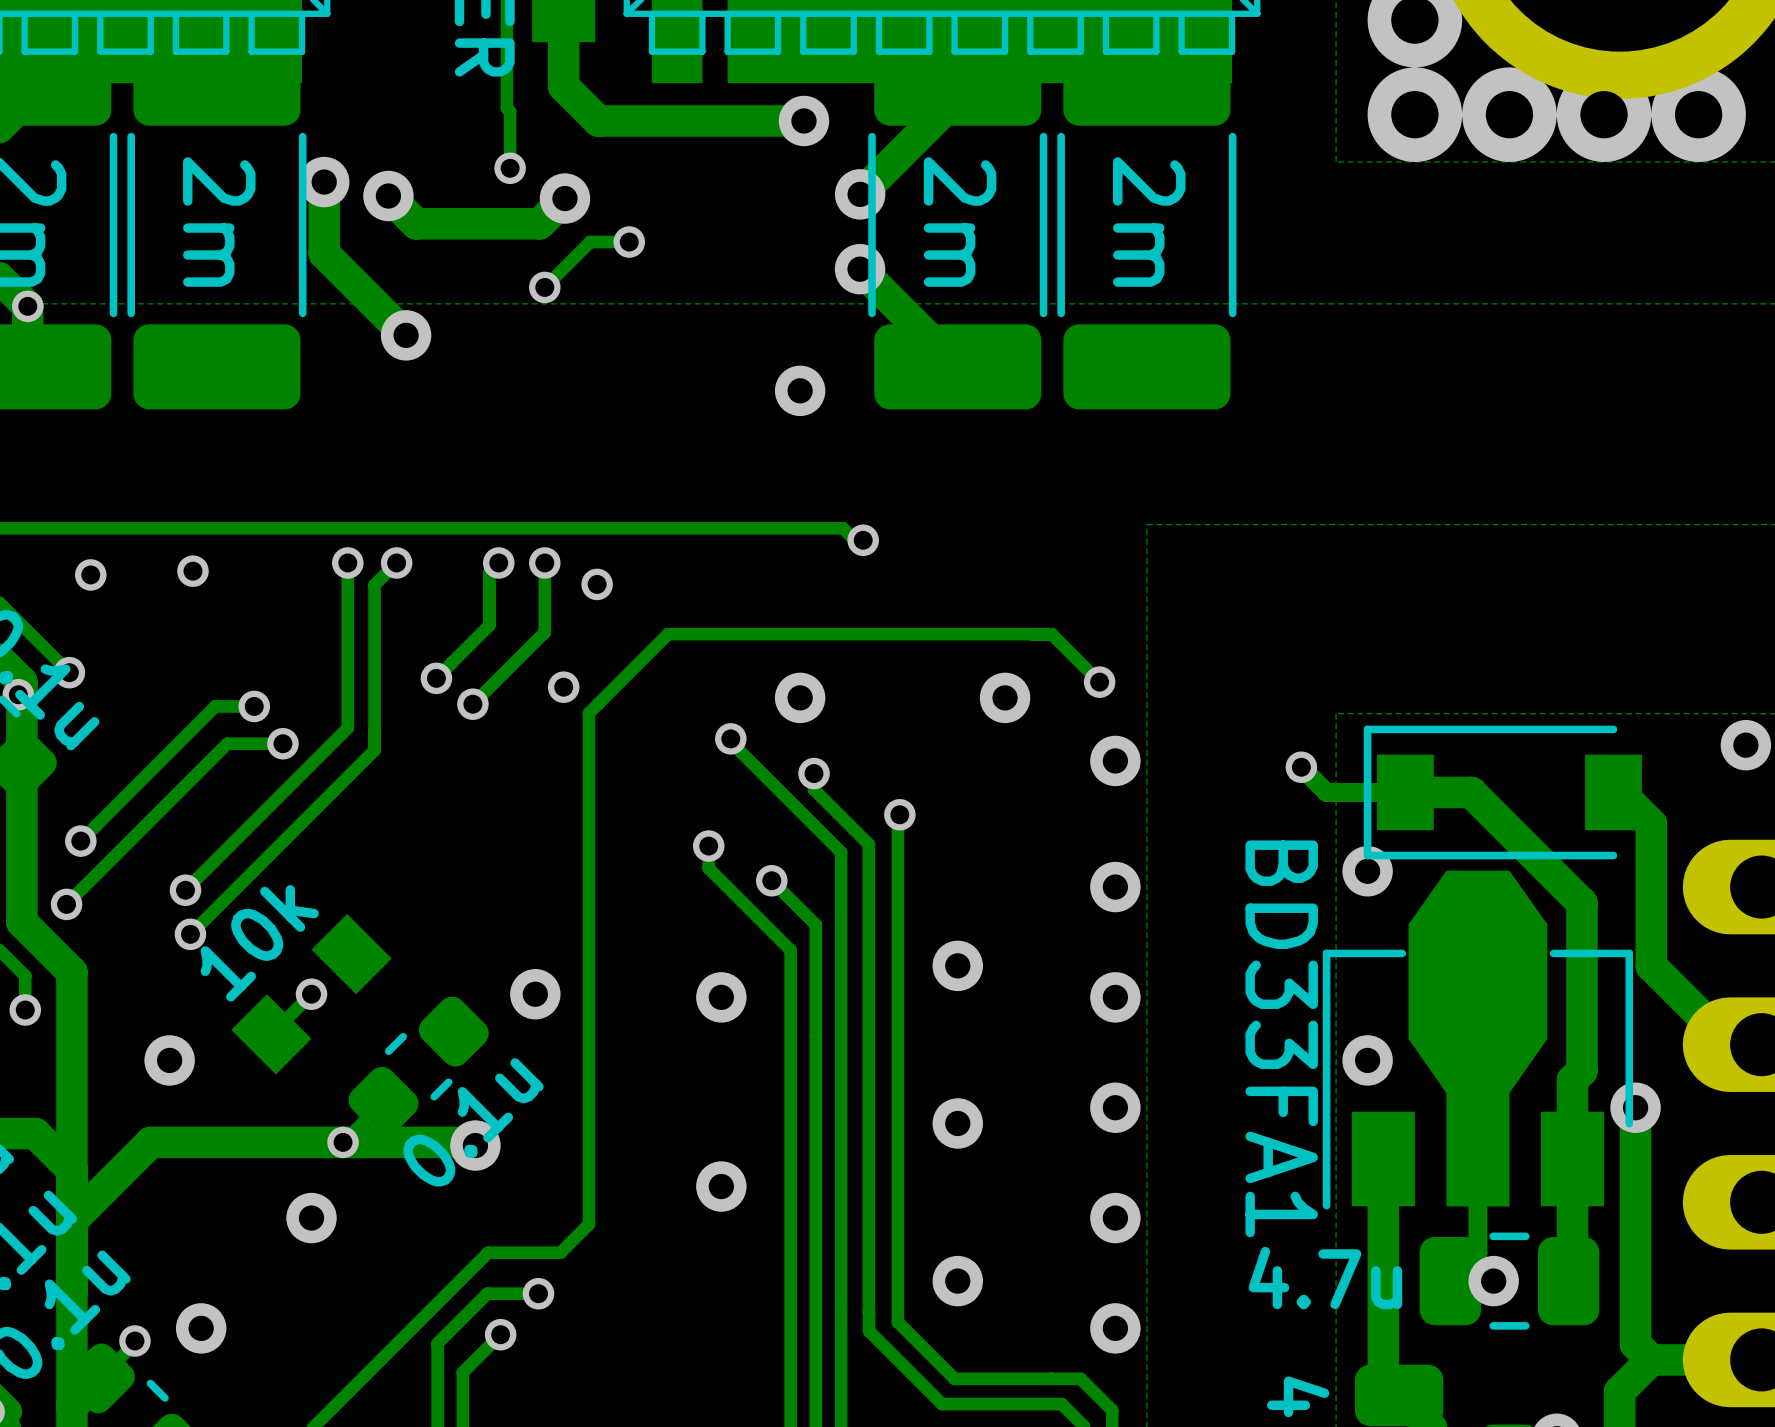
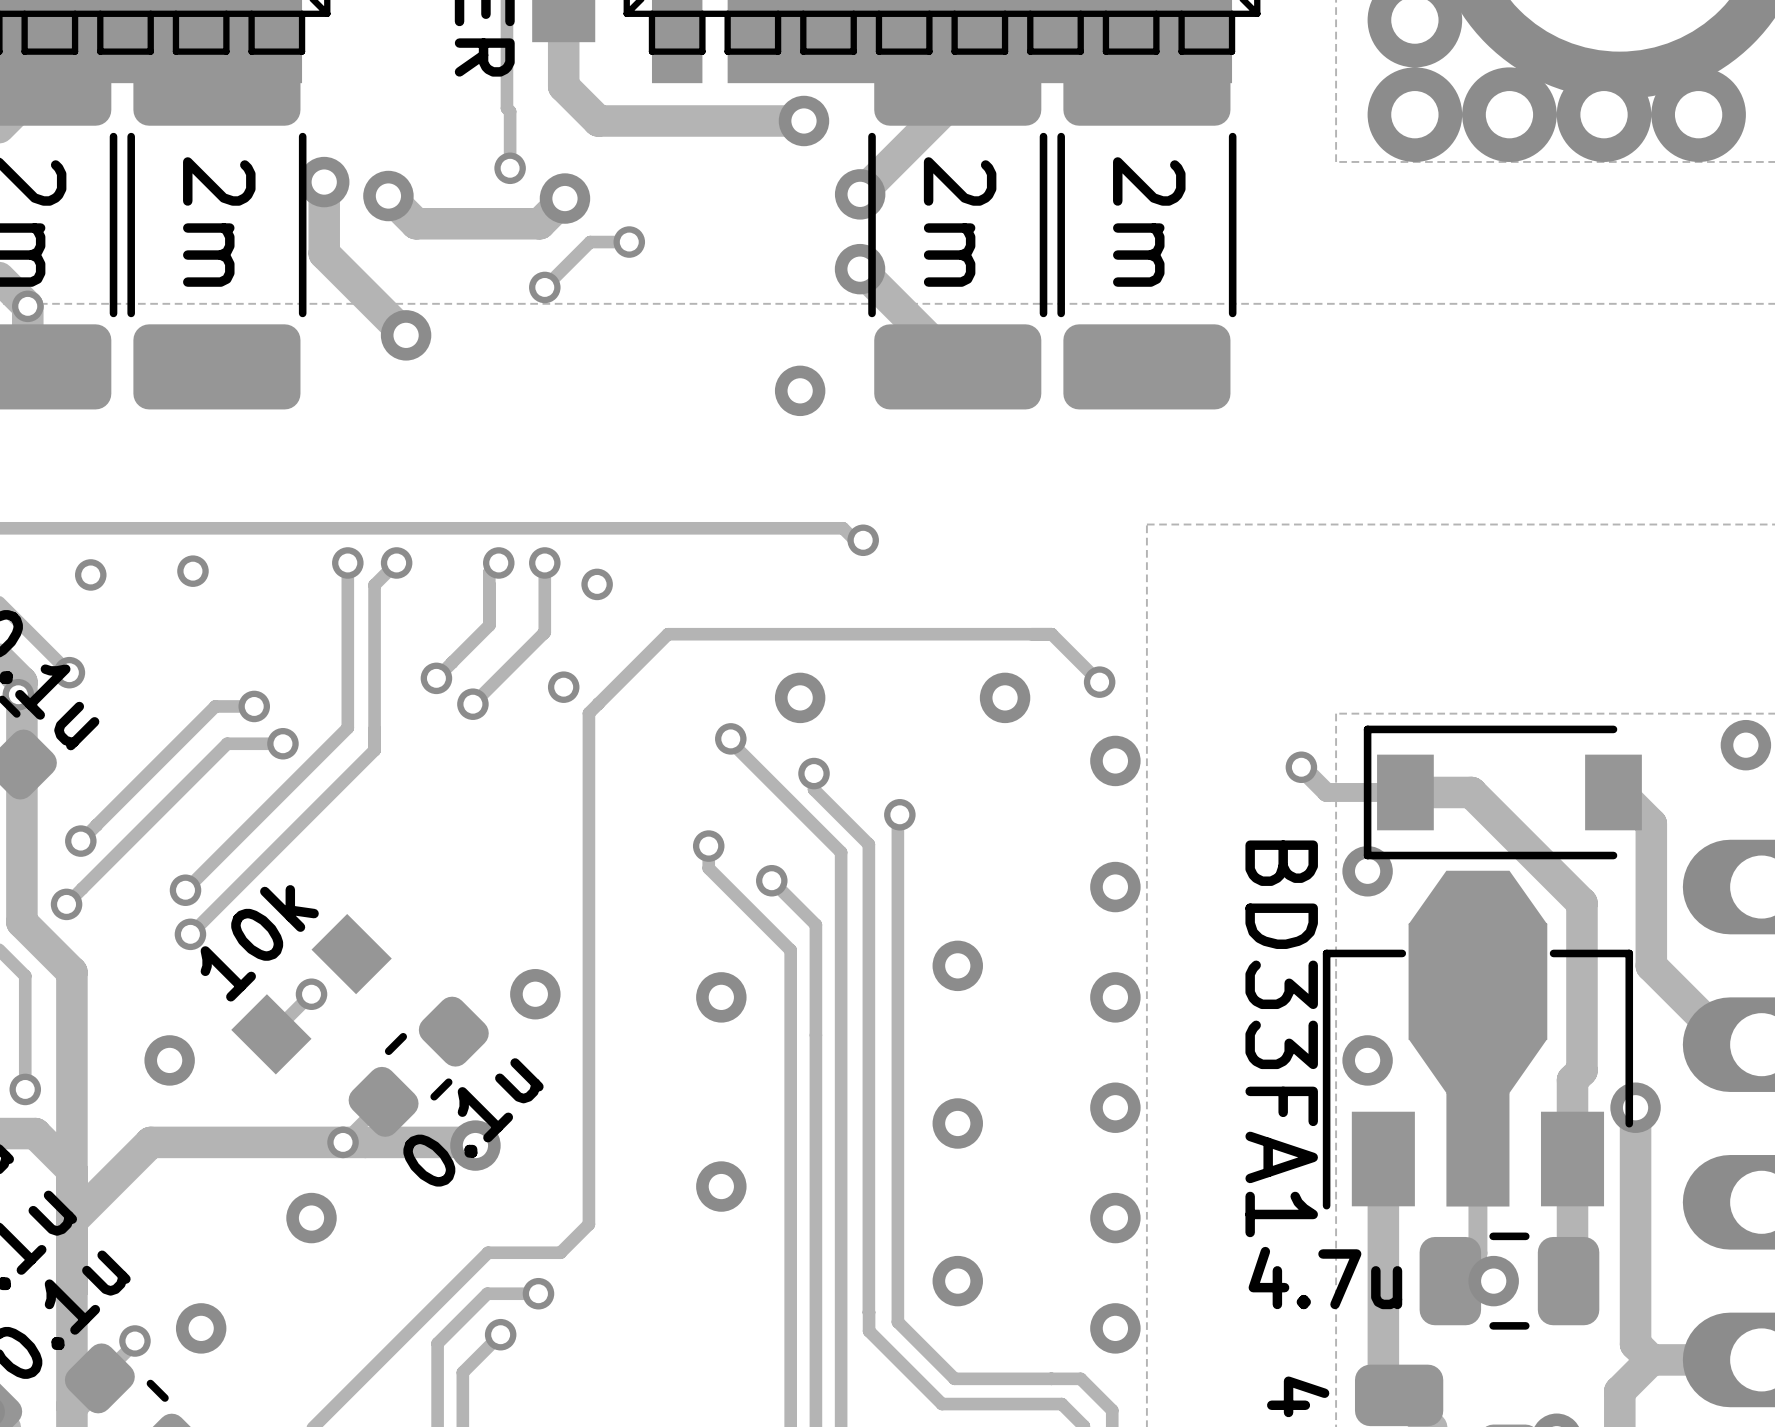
track: none -> (25, 1009) (25, 1089)
via: (25, 1009) -> none
via: none -> (25, 1089)

